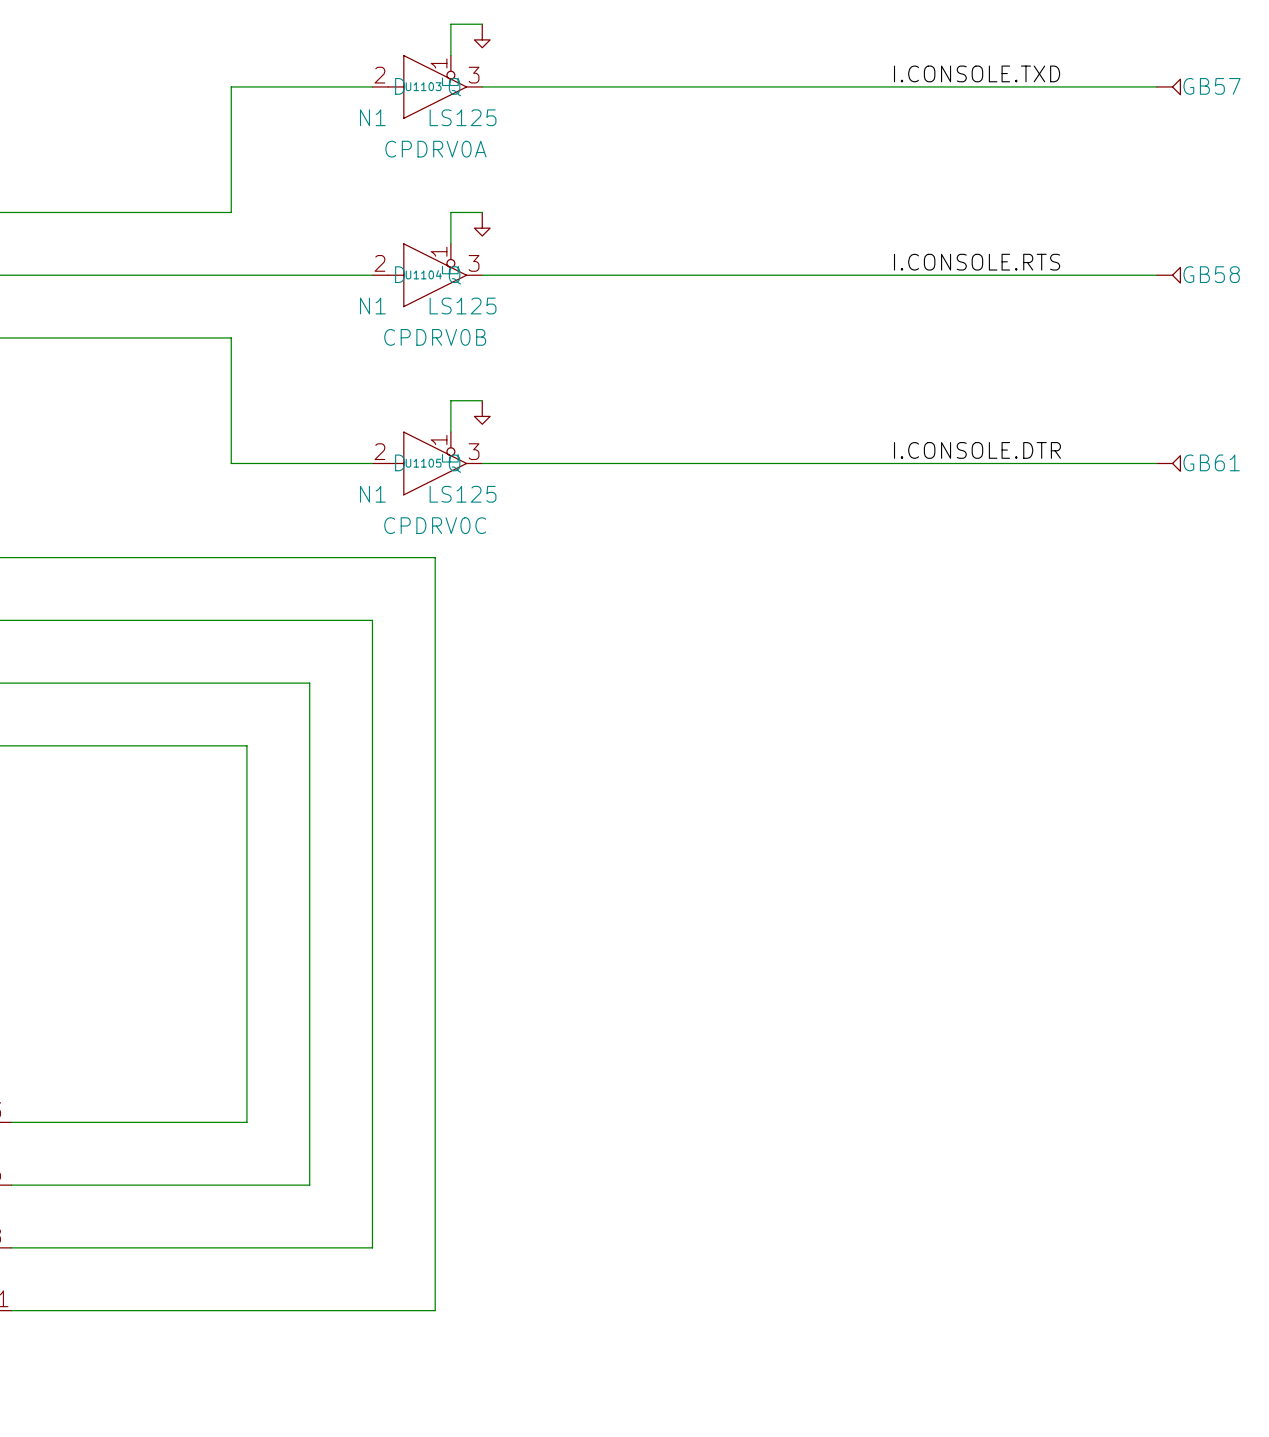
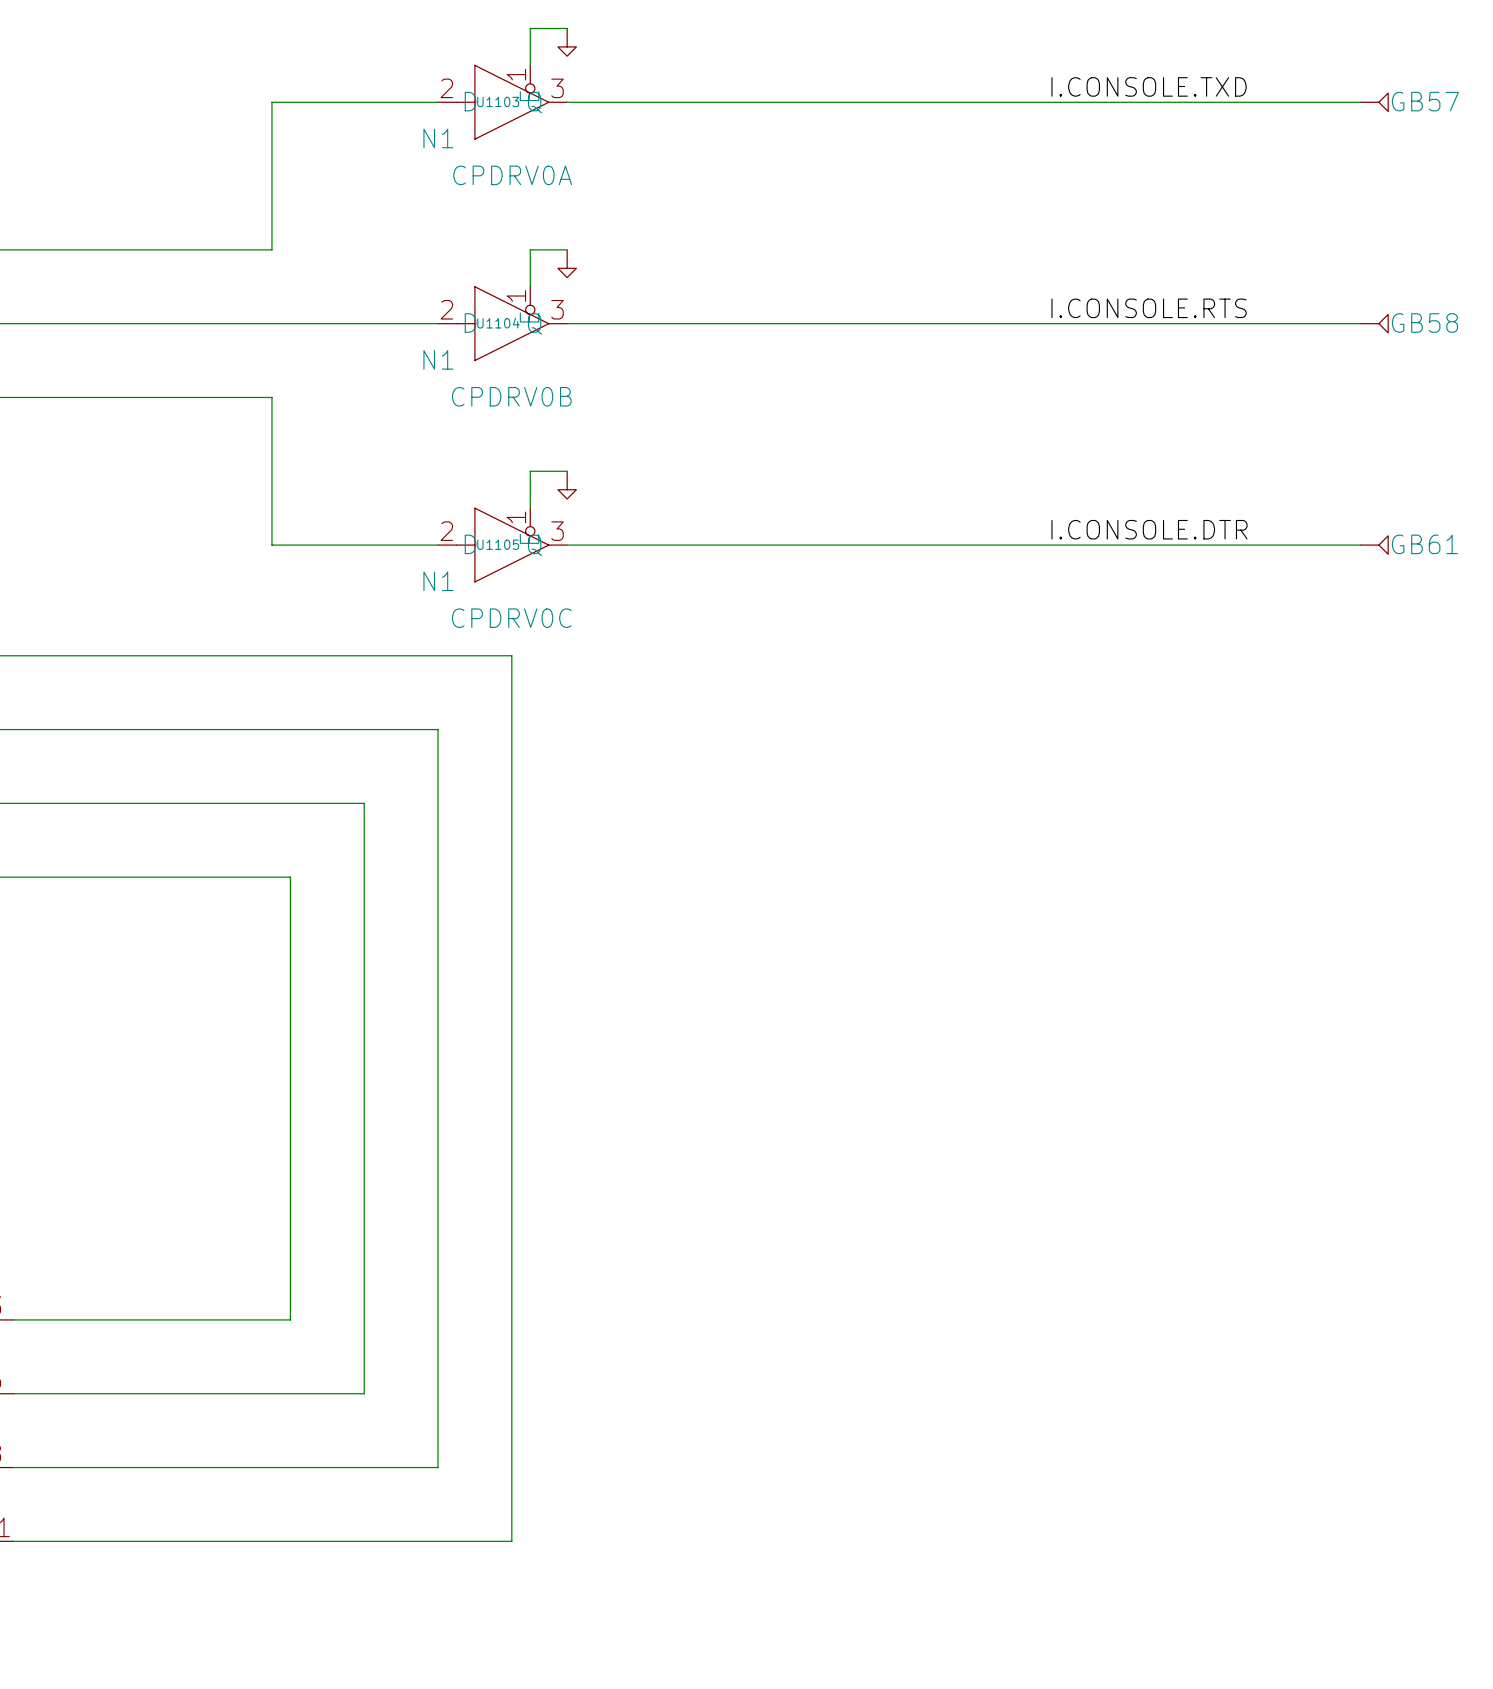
U1103 value: LS125 (463, 117) -> none
U1104 value: LS125 (463, 306) -> none
U1105 value: LS125 (463, 494) -> none

